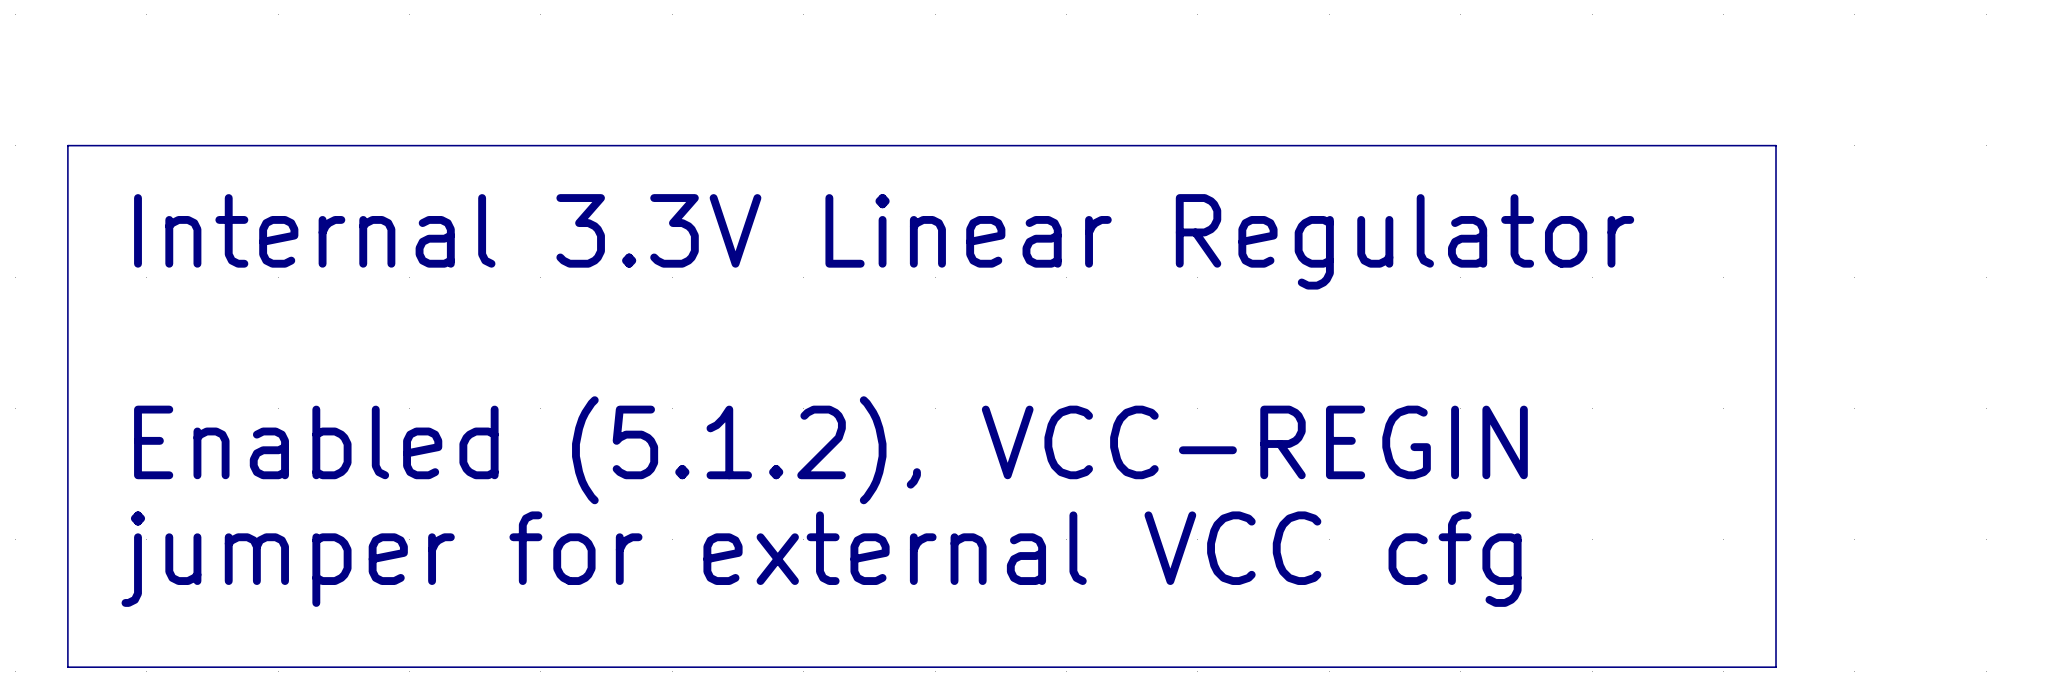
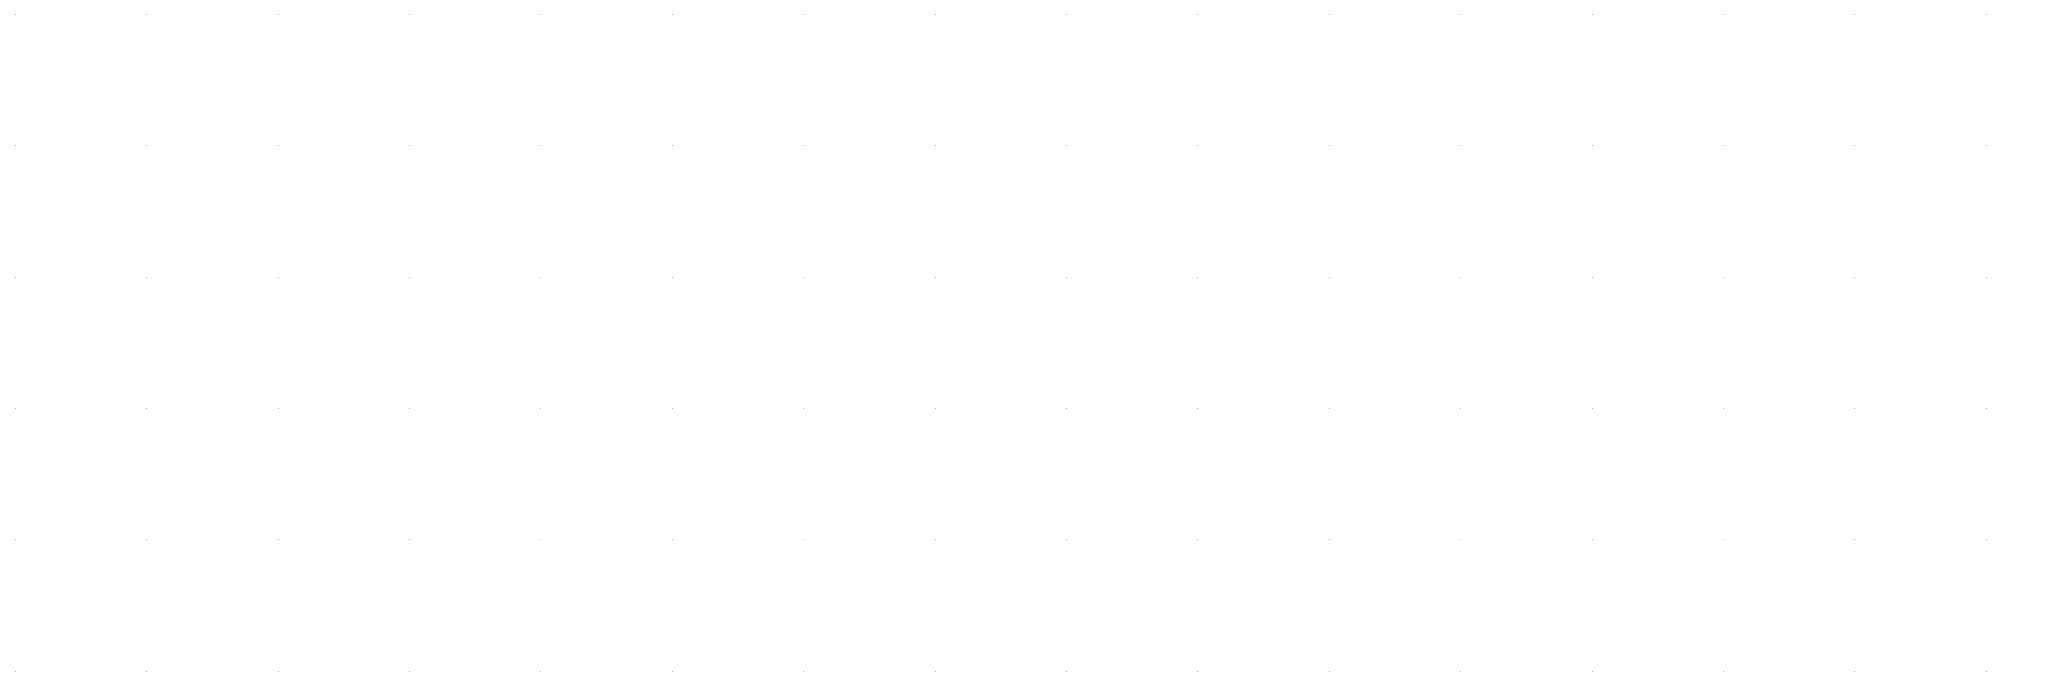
line: (67, 145) (1776, 145) (1776, 667) (67, 667) (67, 145) -> none
text: Internal 3.3V Linear Regulator (884, 241) -> none
text: Enabled (5.1.2), VCC-REGIN (830, 450) -> none
text: jumper for external VCC cfg (821, 559) -> none

